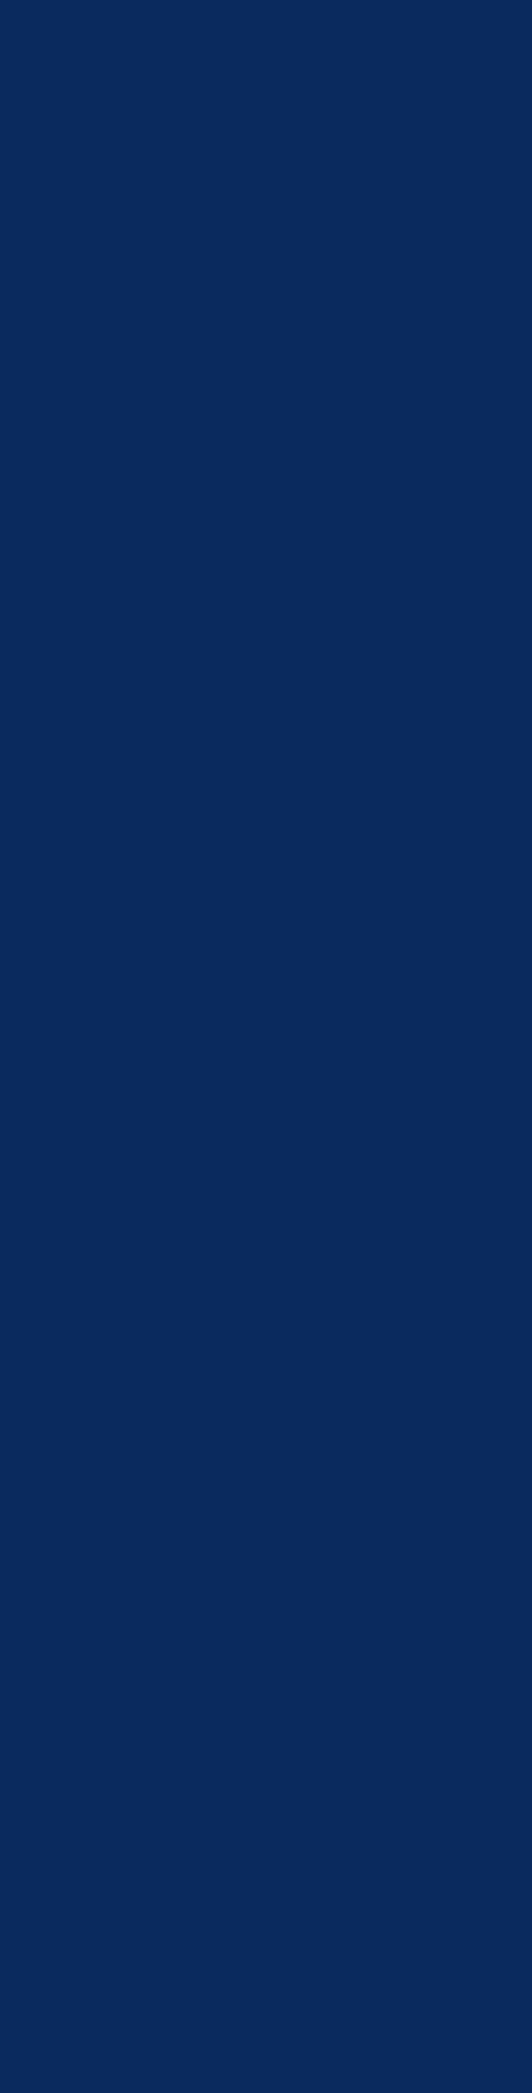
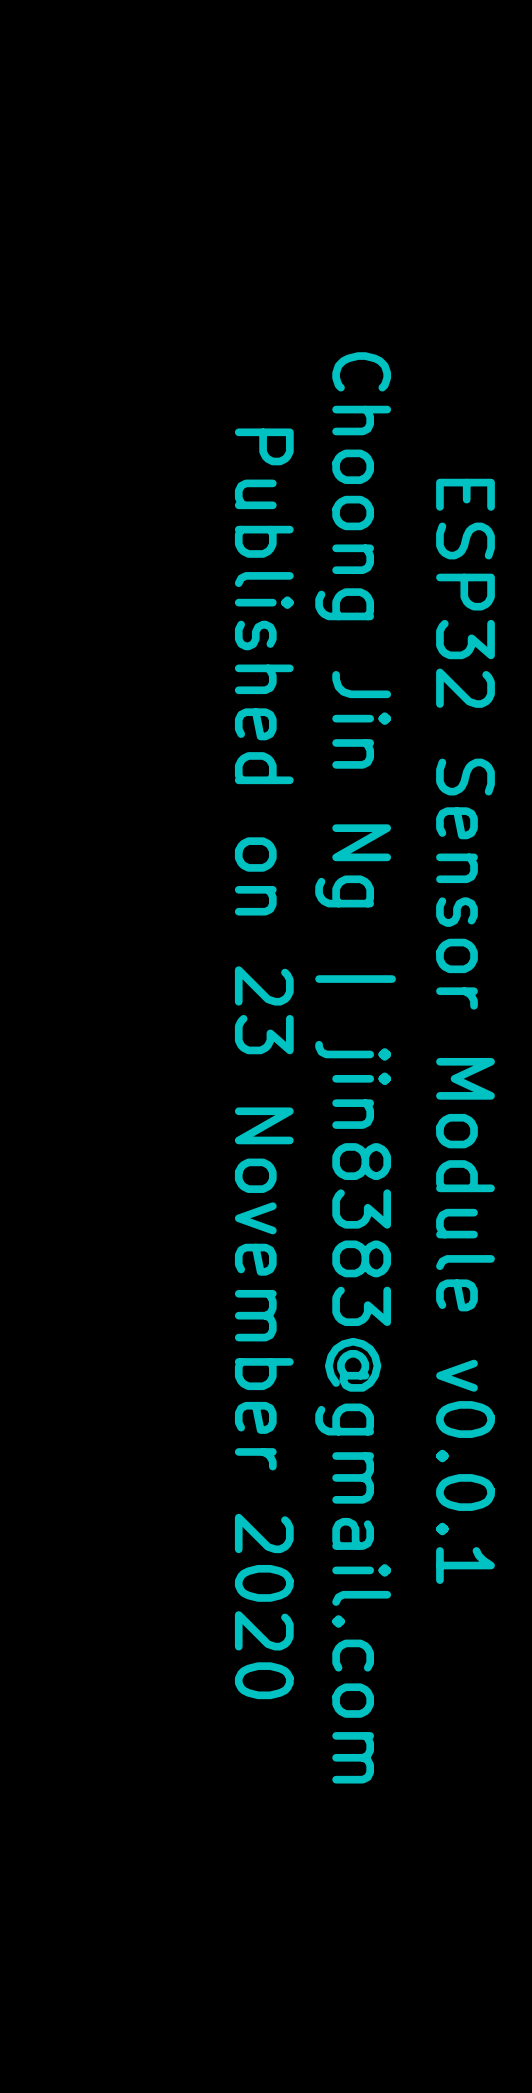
text: none -> ESP32 Sensor Module v0.0.1 (465, 1031)
text: none -> Published on 23 November 2020 (264, 1063)
text: none -> Choong Jin Ng | jin8383@gmail.com (355, 1067)

